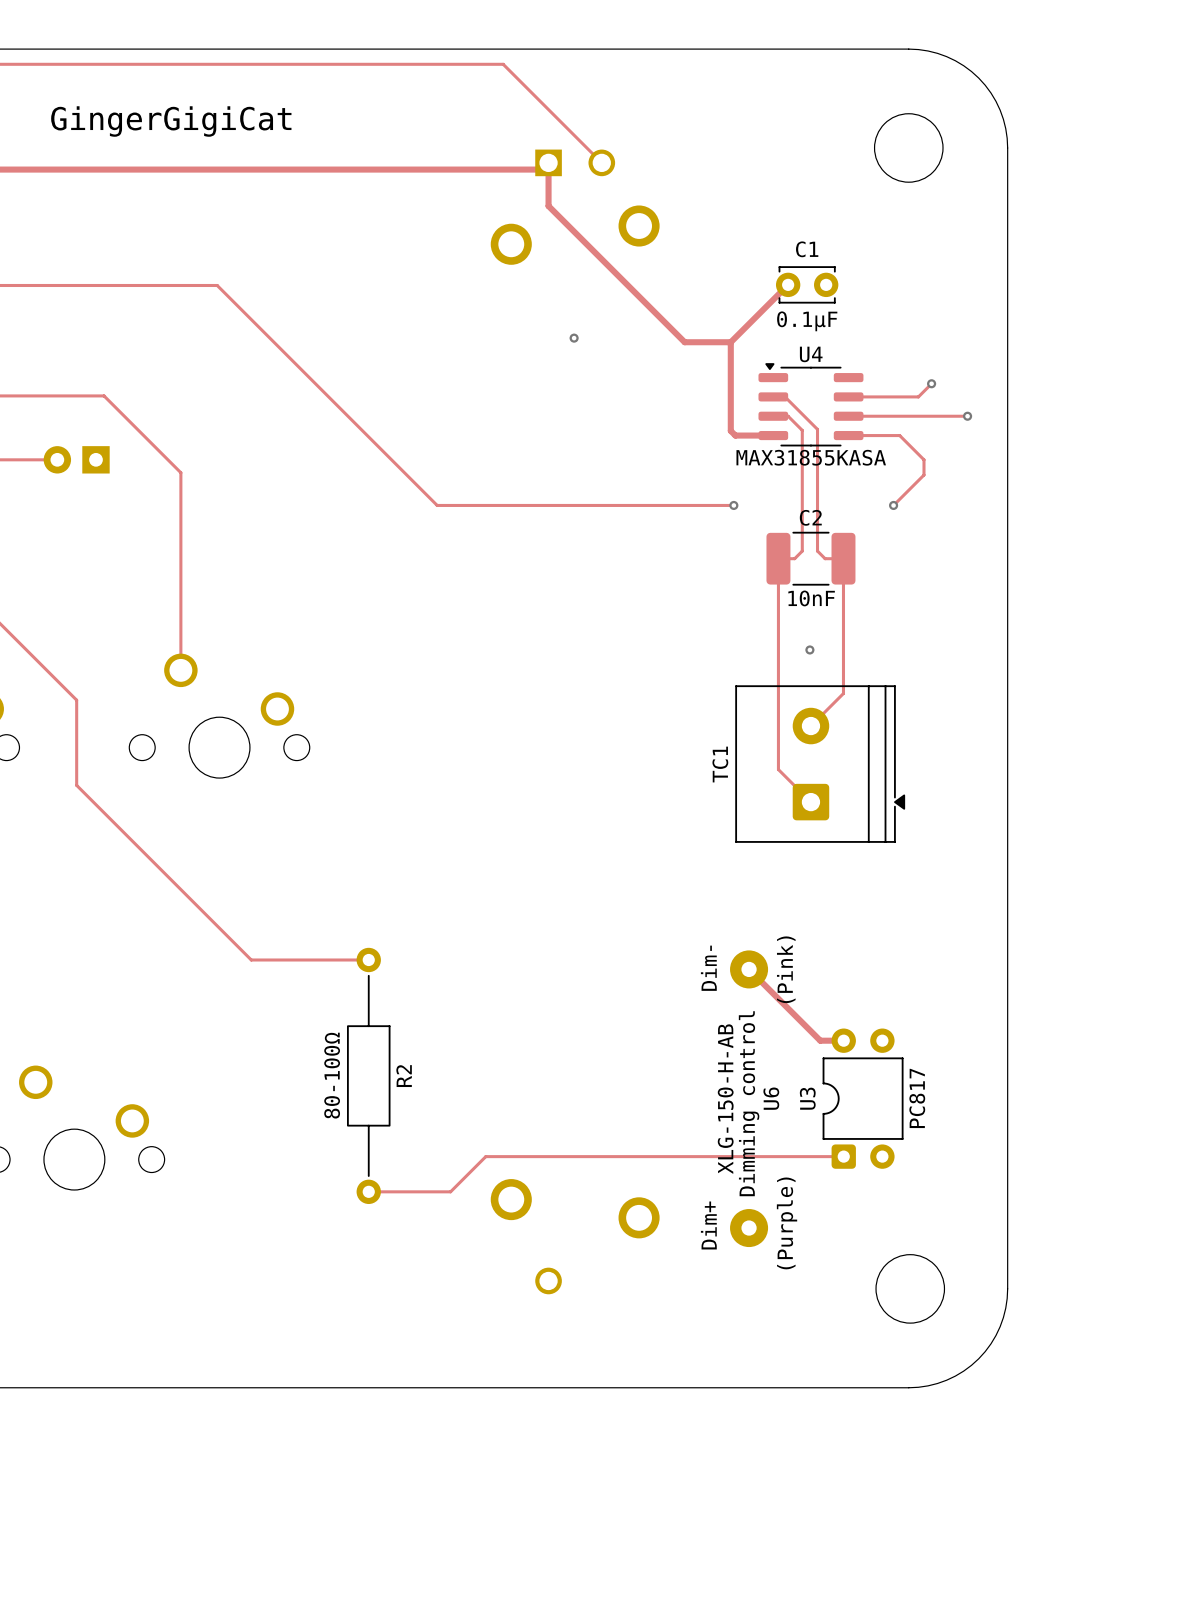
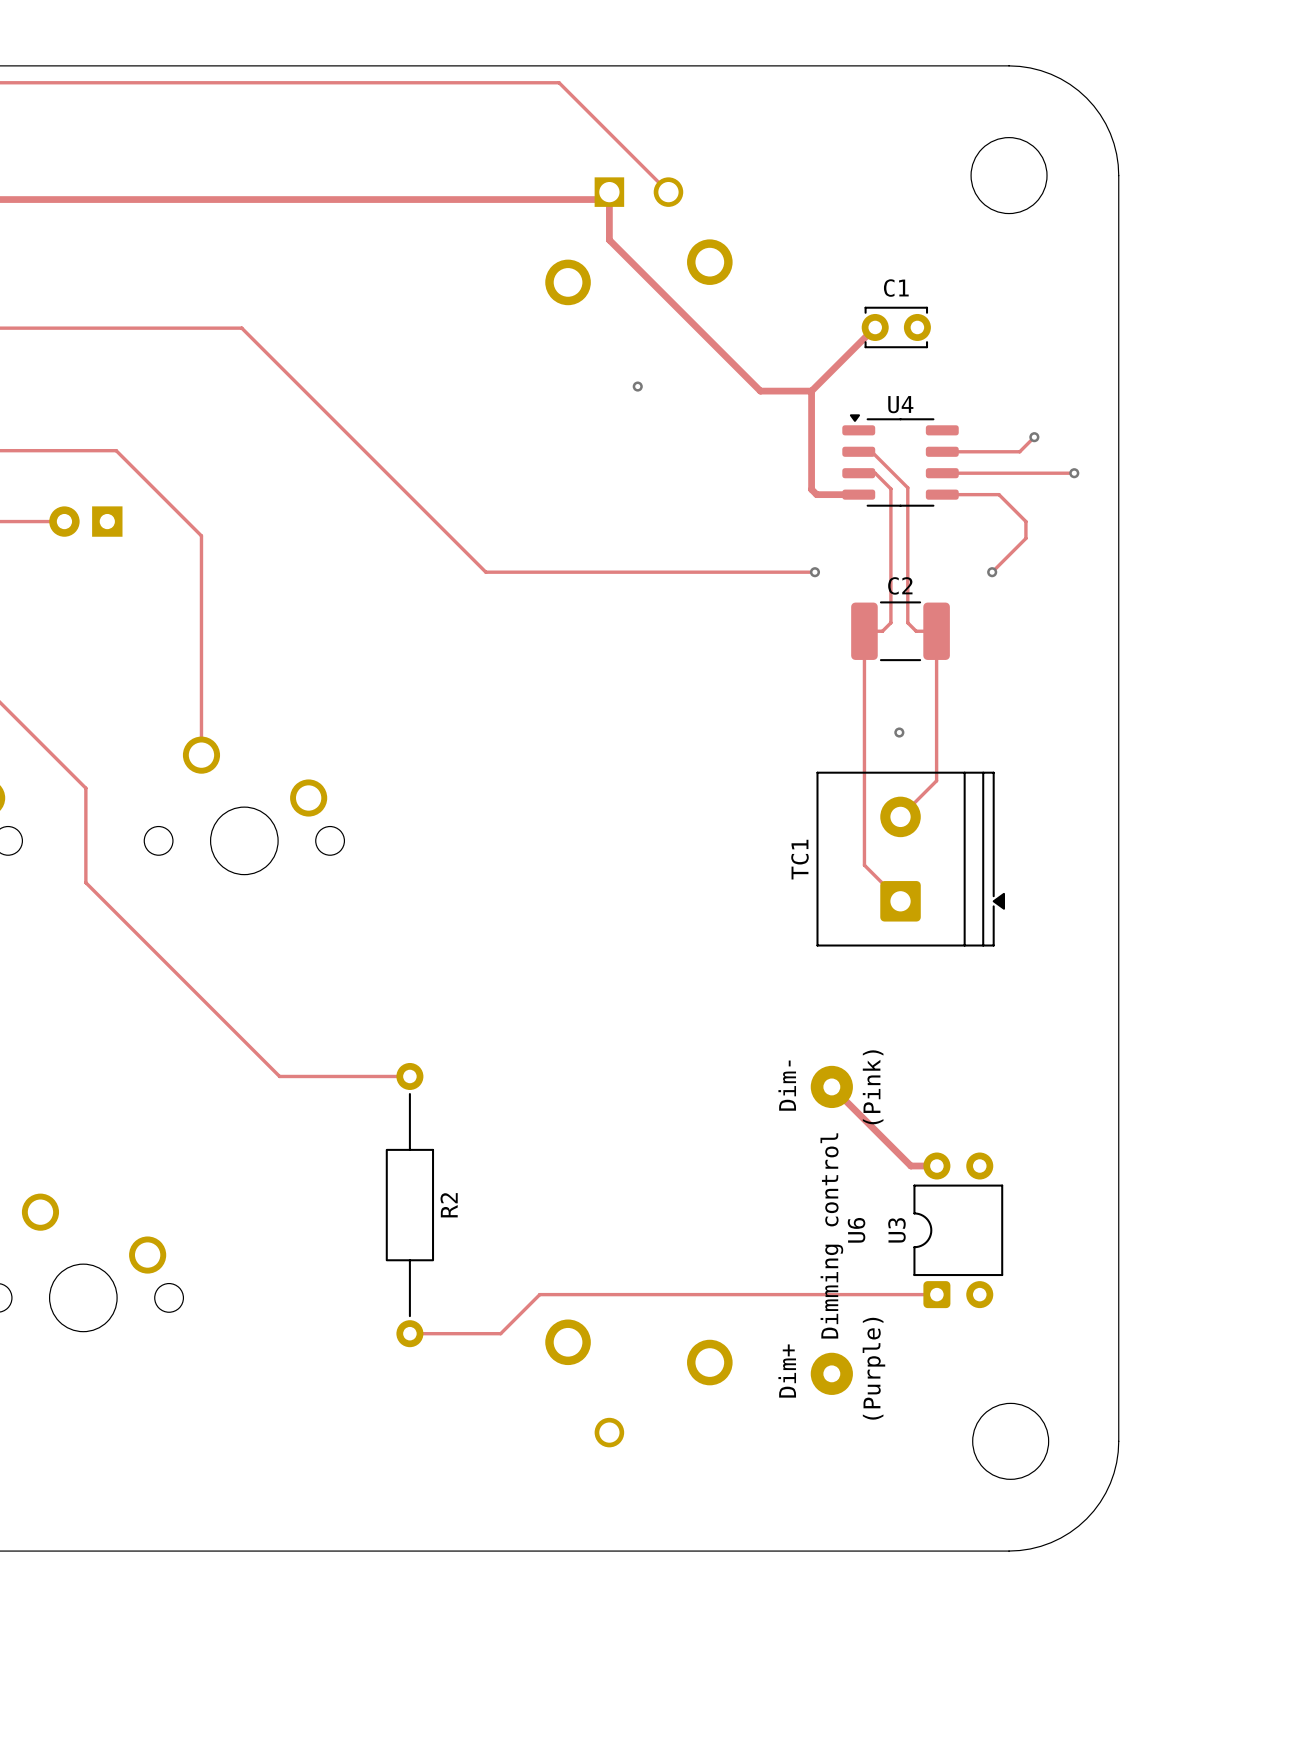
text: GingerGigiCat (171, 121) -> none
C1 value: 0.1µF (807, 321) -> none
U4 value: MAX31855KASA (811, 457) -> none
C2 value: 10nF (811, 598) -> none
R2 value: 80-100Ω (332, 1075) -> none
U3 value: PC817 (917, 1098) -> none
text: XLG-150-H-AB (725, 1099) -> none

